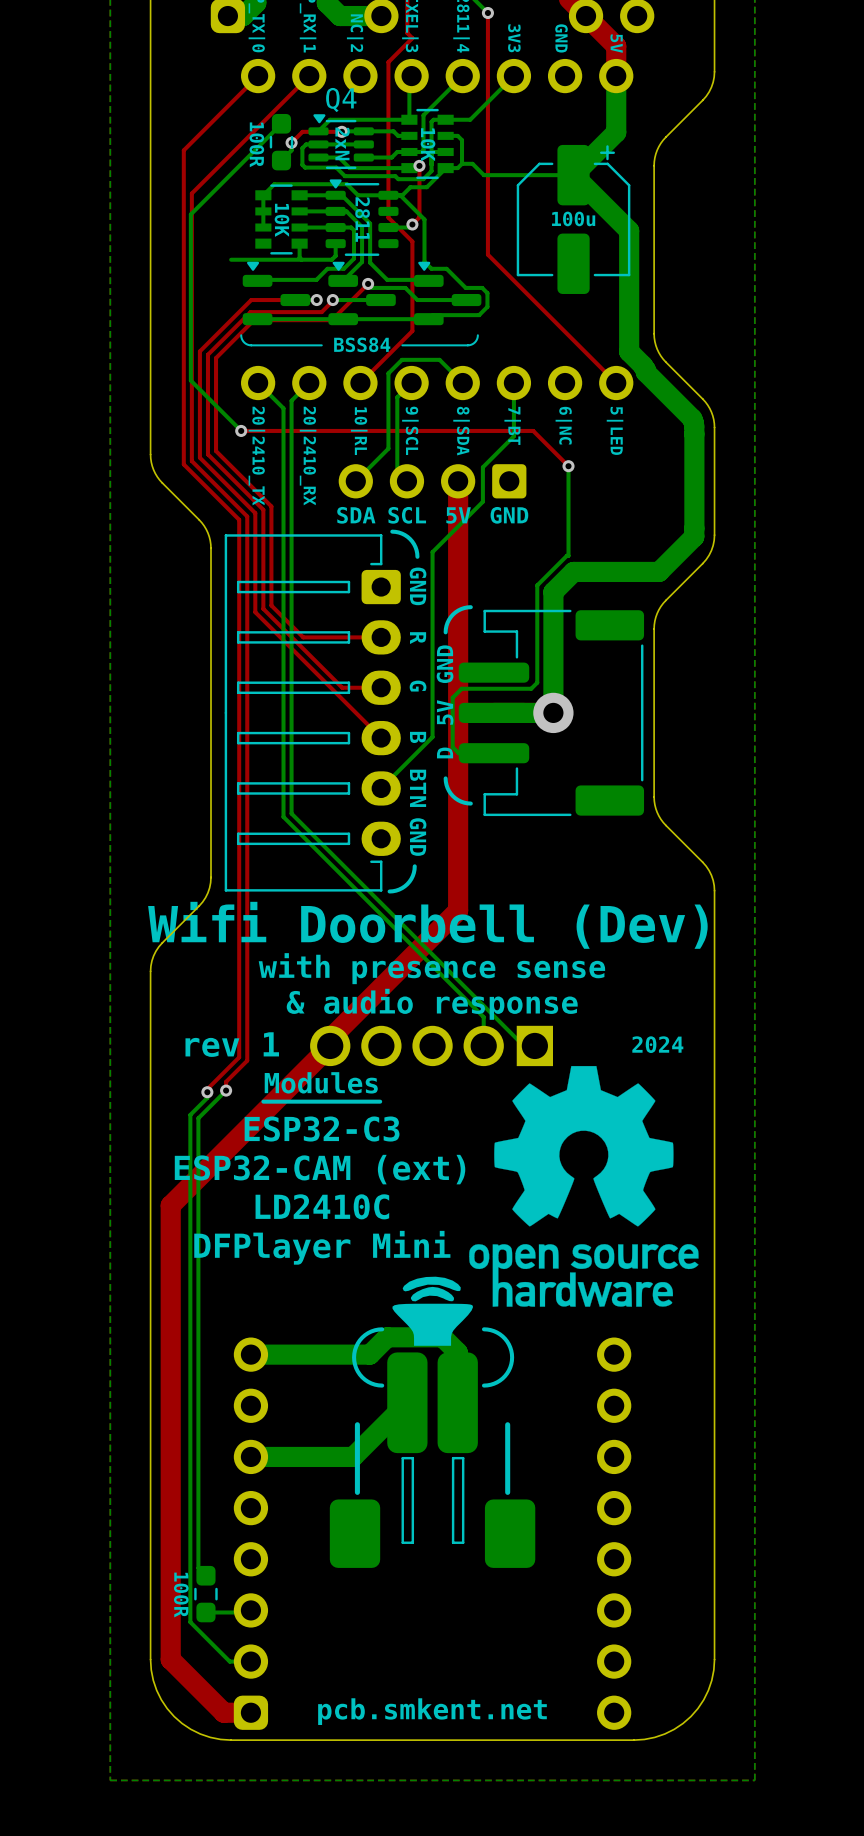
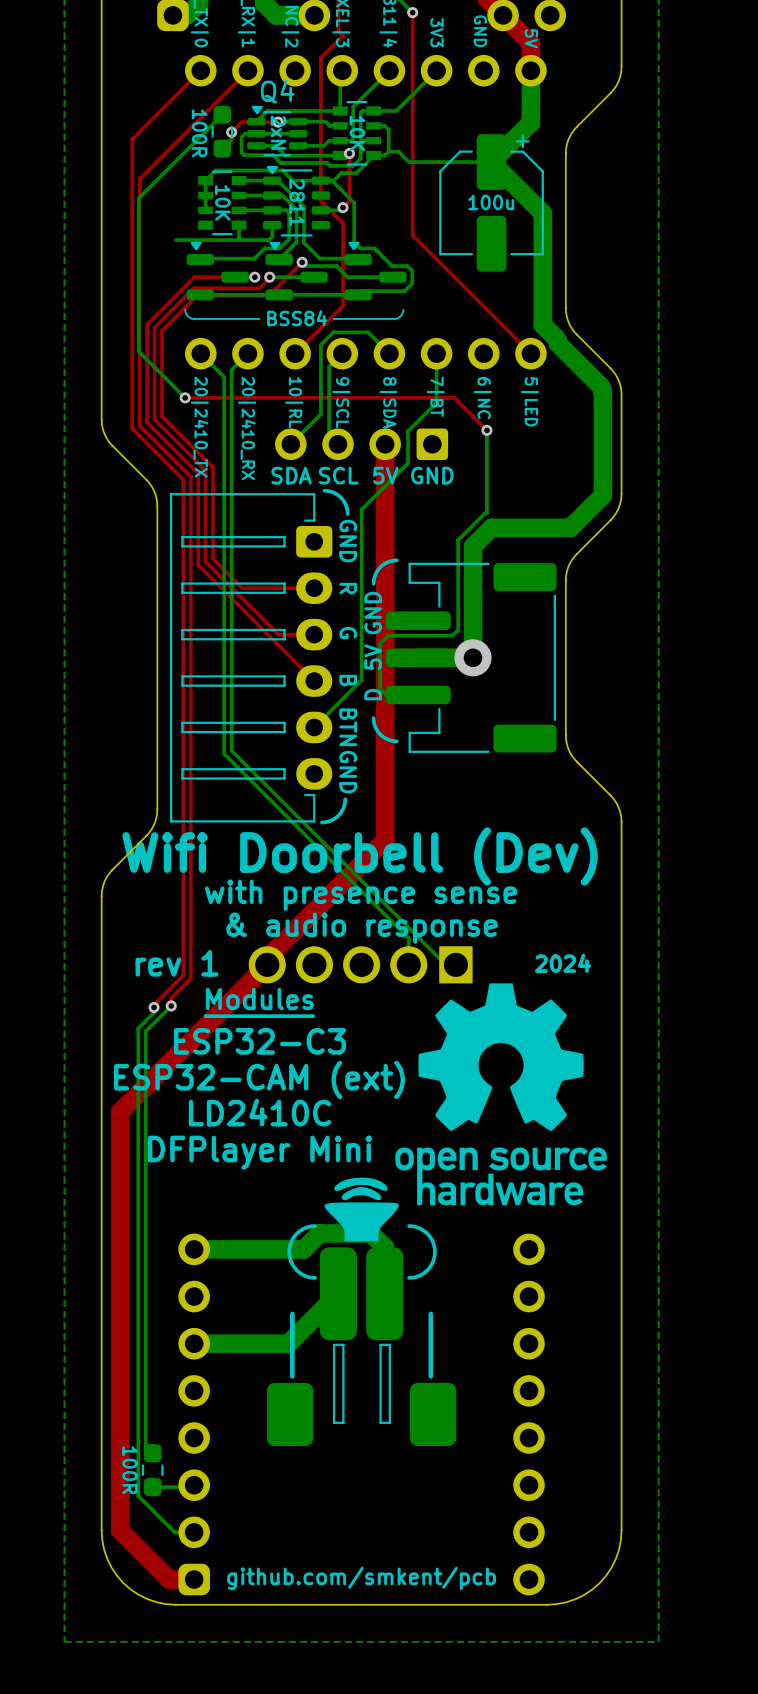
text: pcb.smkent.net (432, 1711) -> github.com/smkent/pcb (361, 1578)

